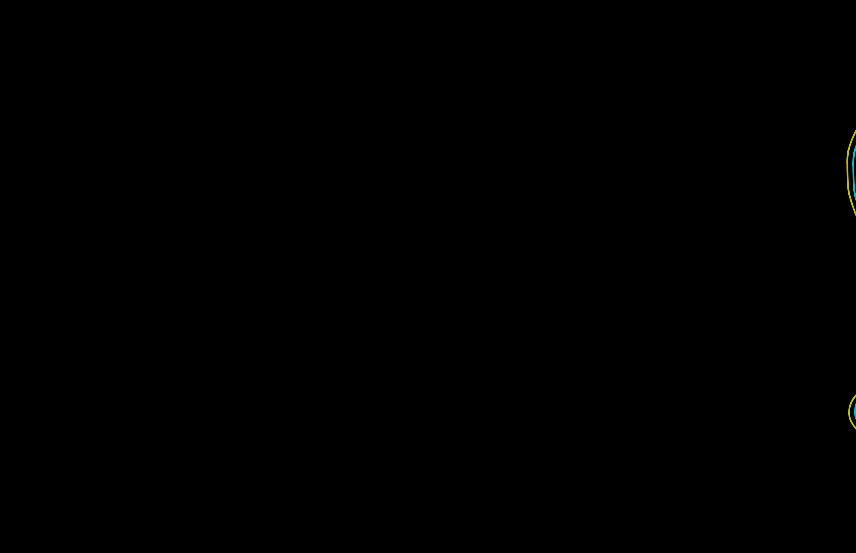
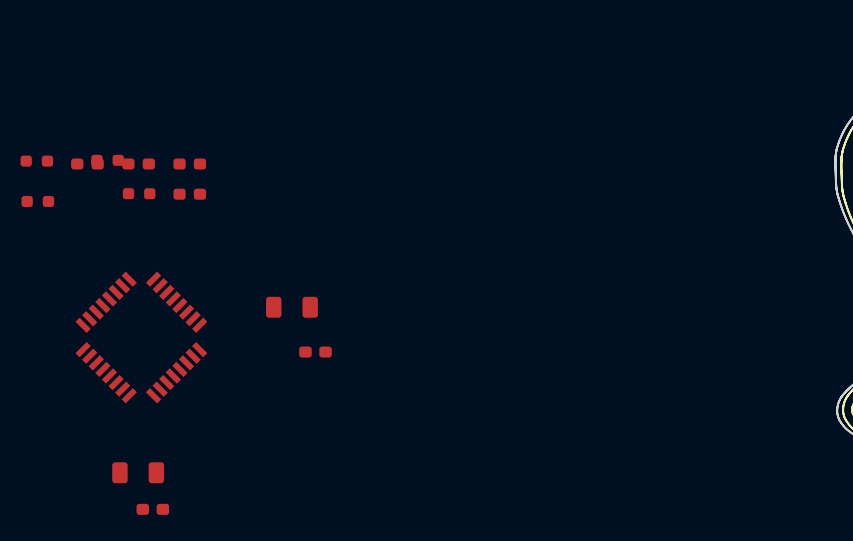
part: none -> (107, 160)
part: none -> (36, 161)
part: none -> (87, 163)
part: none -> (138, 163)
part: none -> (189, 163)
part: none -> (139, 193)
part: none -> (189, 194)
part: none -> (37, 201)
part: none -> (291, 307)
part: none -> (141, 337)
part: none -> (315, 352)
part: none -> (138, 472)
part: none -> (152, 509)

